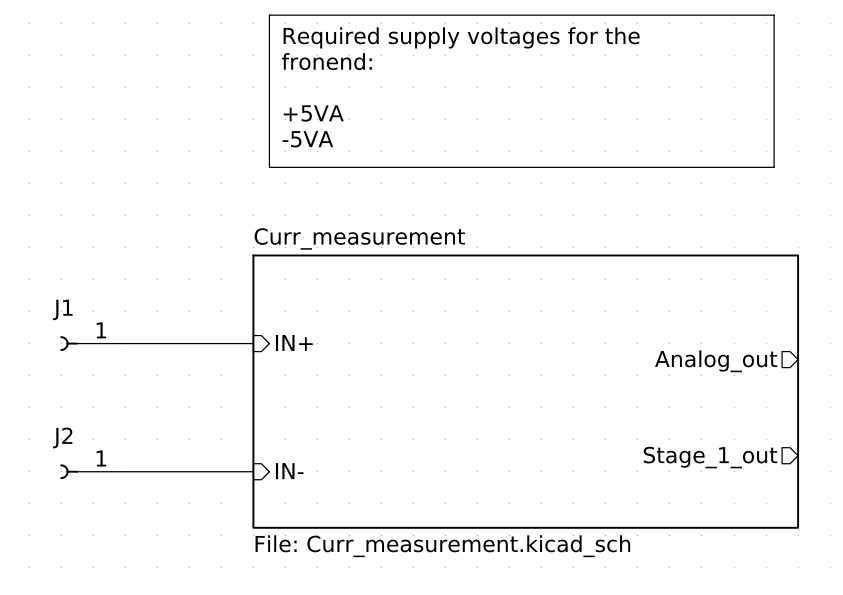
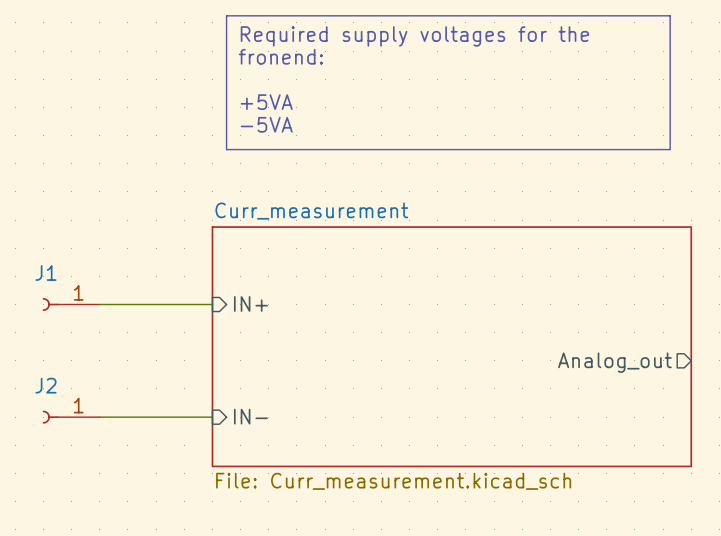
sheet pin position: Analog_out (716, 361) -> Analog_out (614, 362)
sheet pin: Stage_1_out (710, 457) -> none

